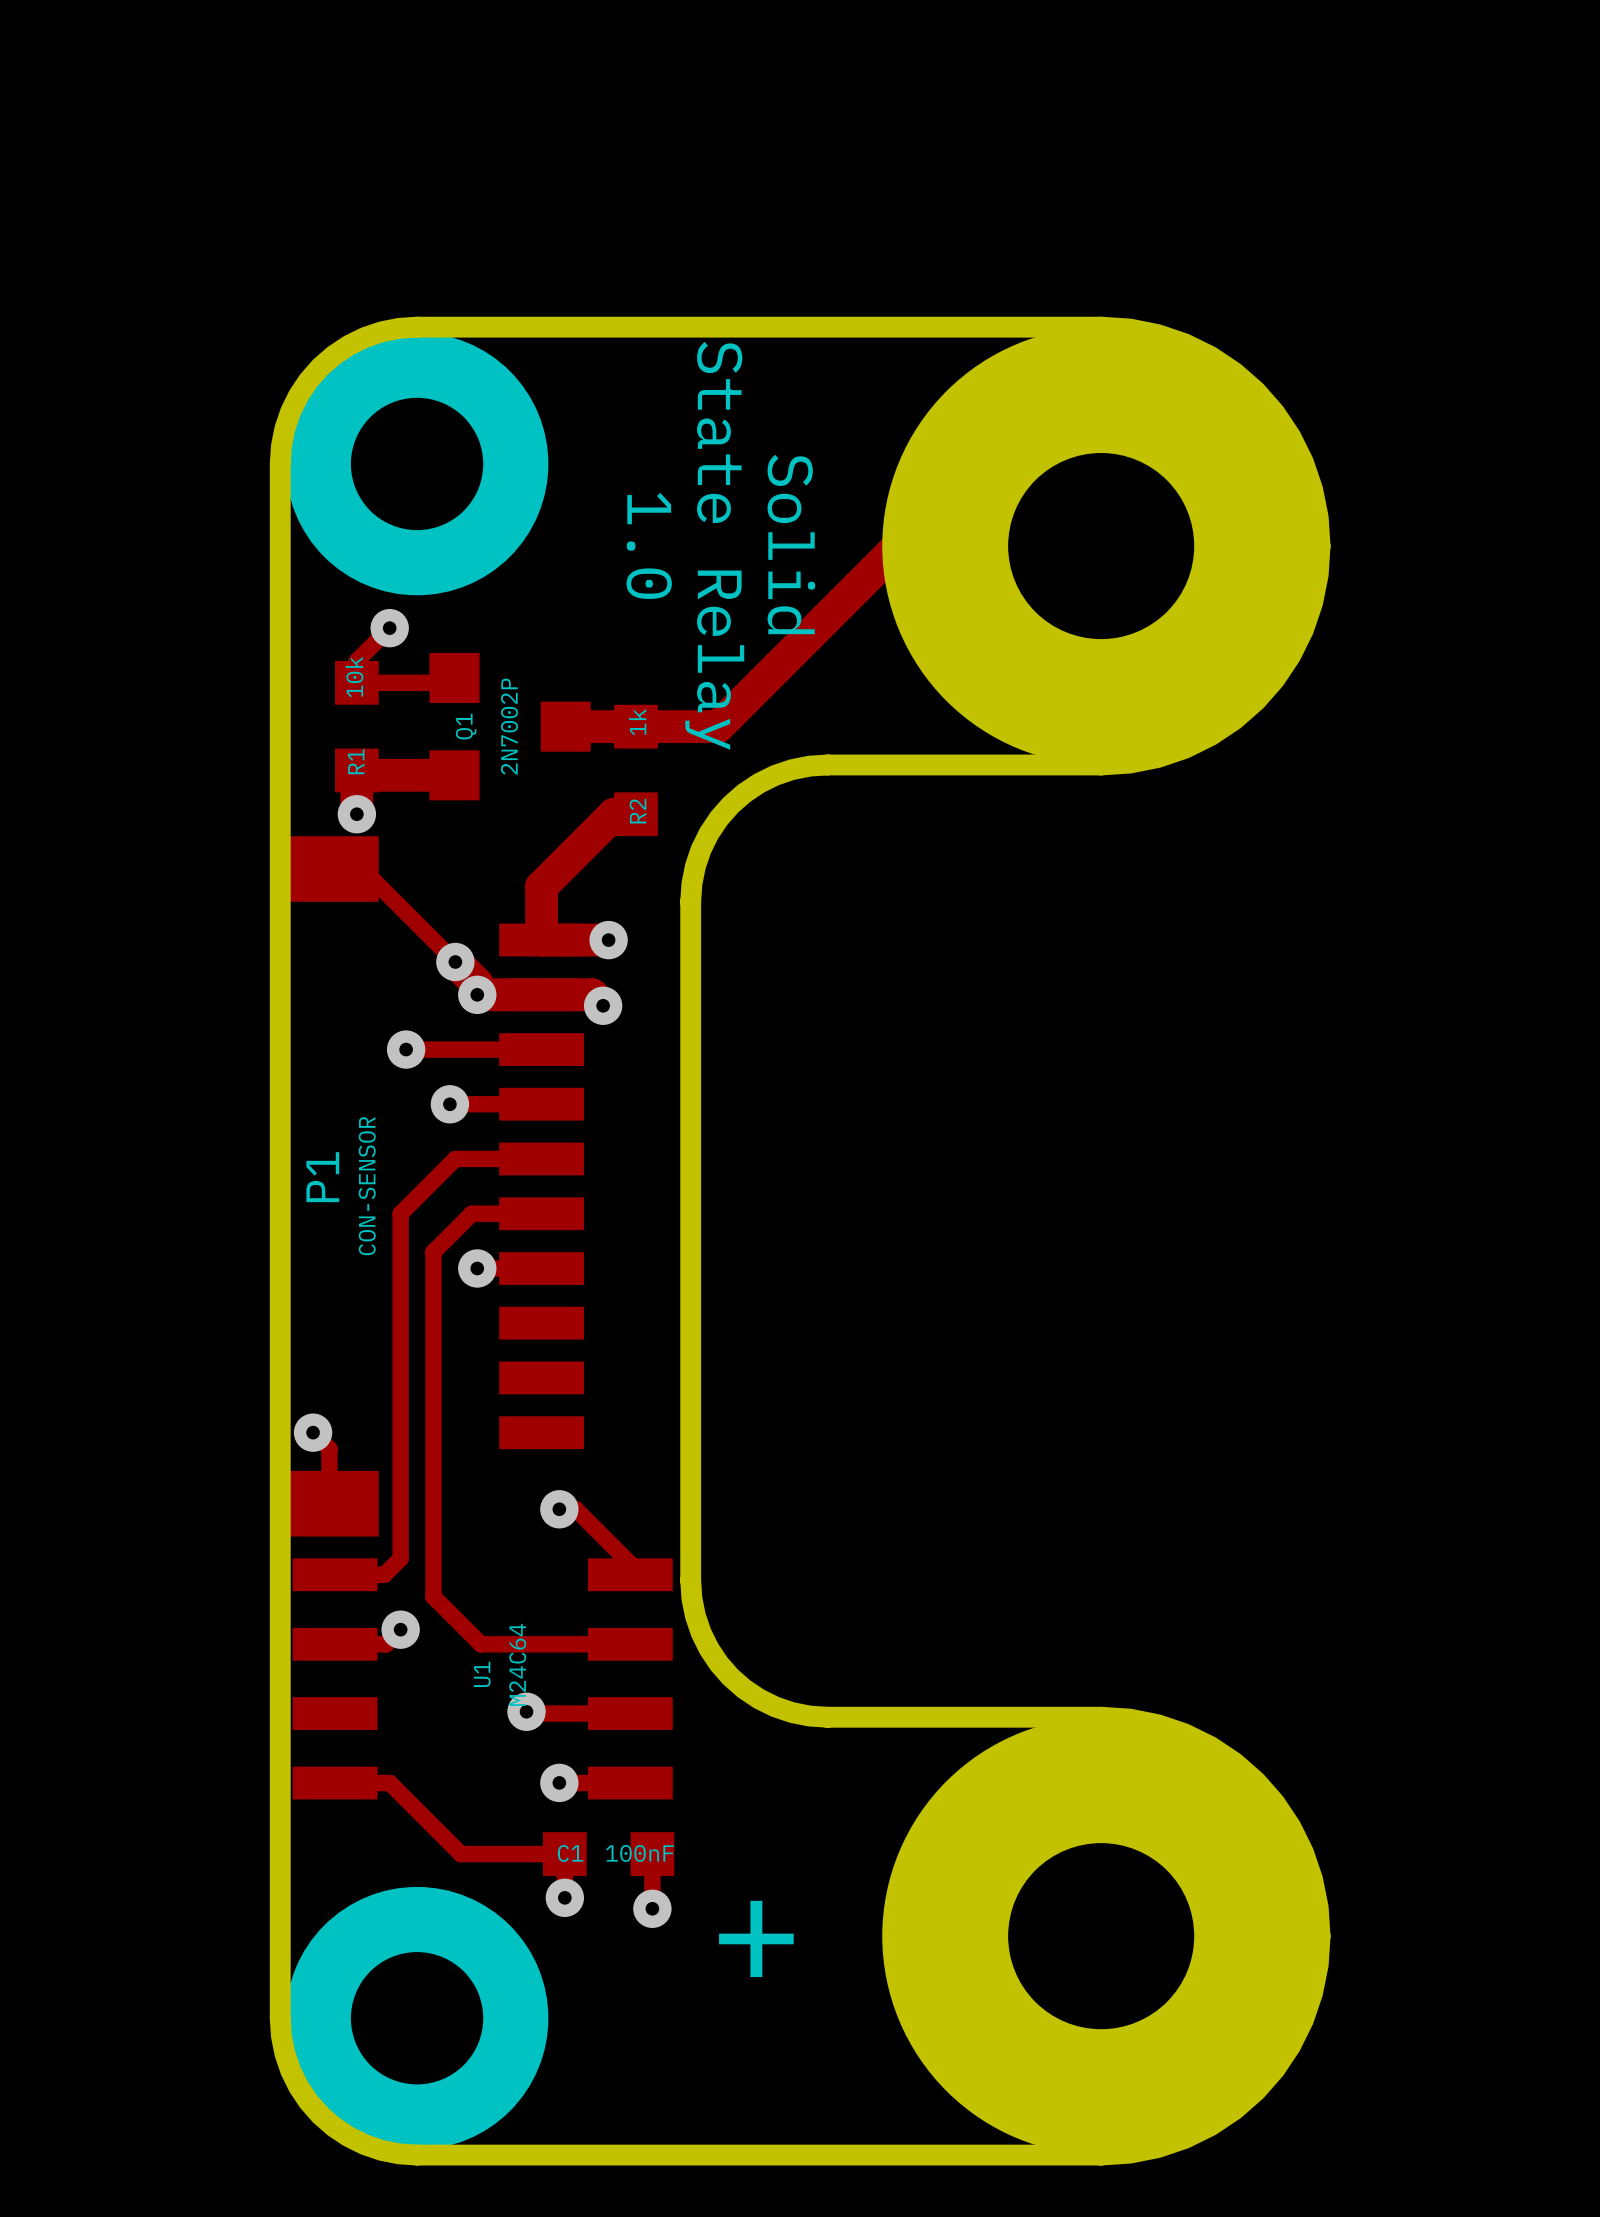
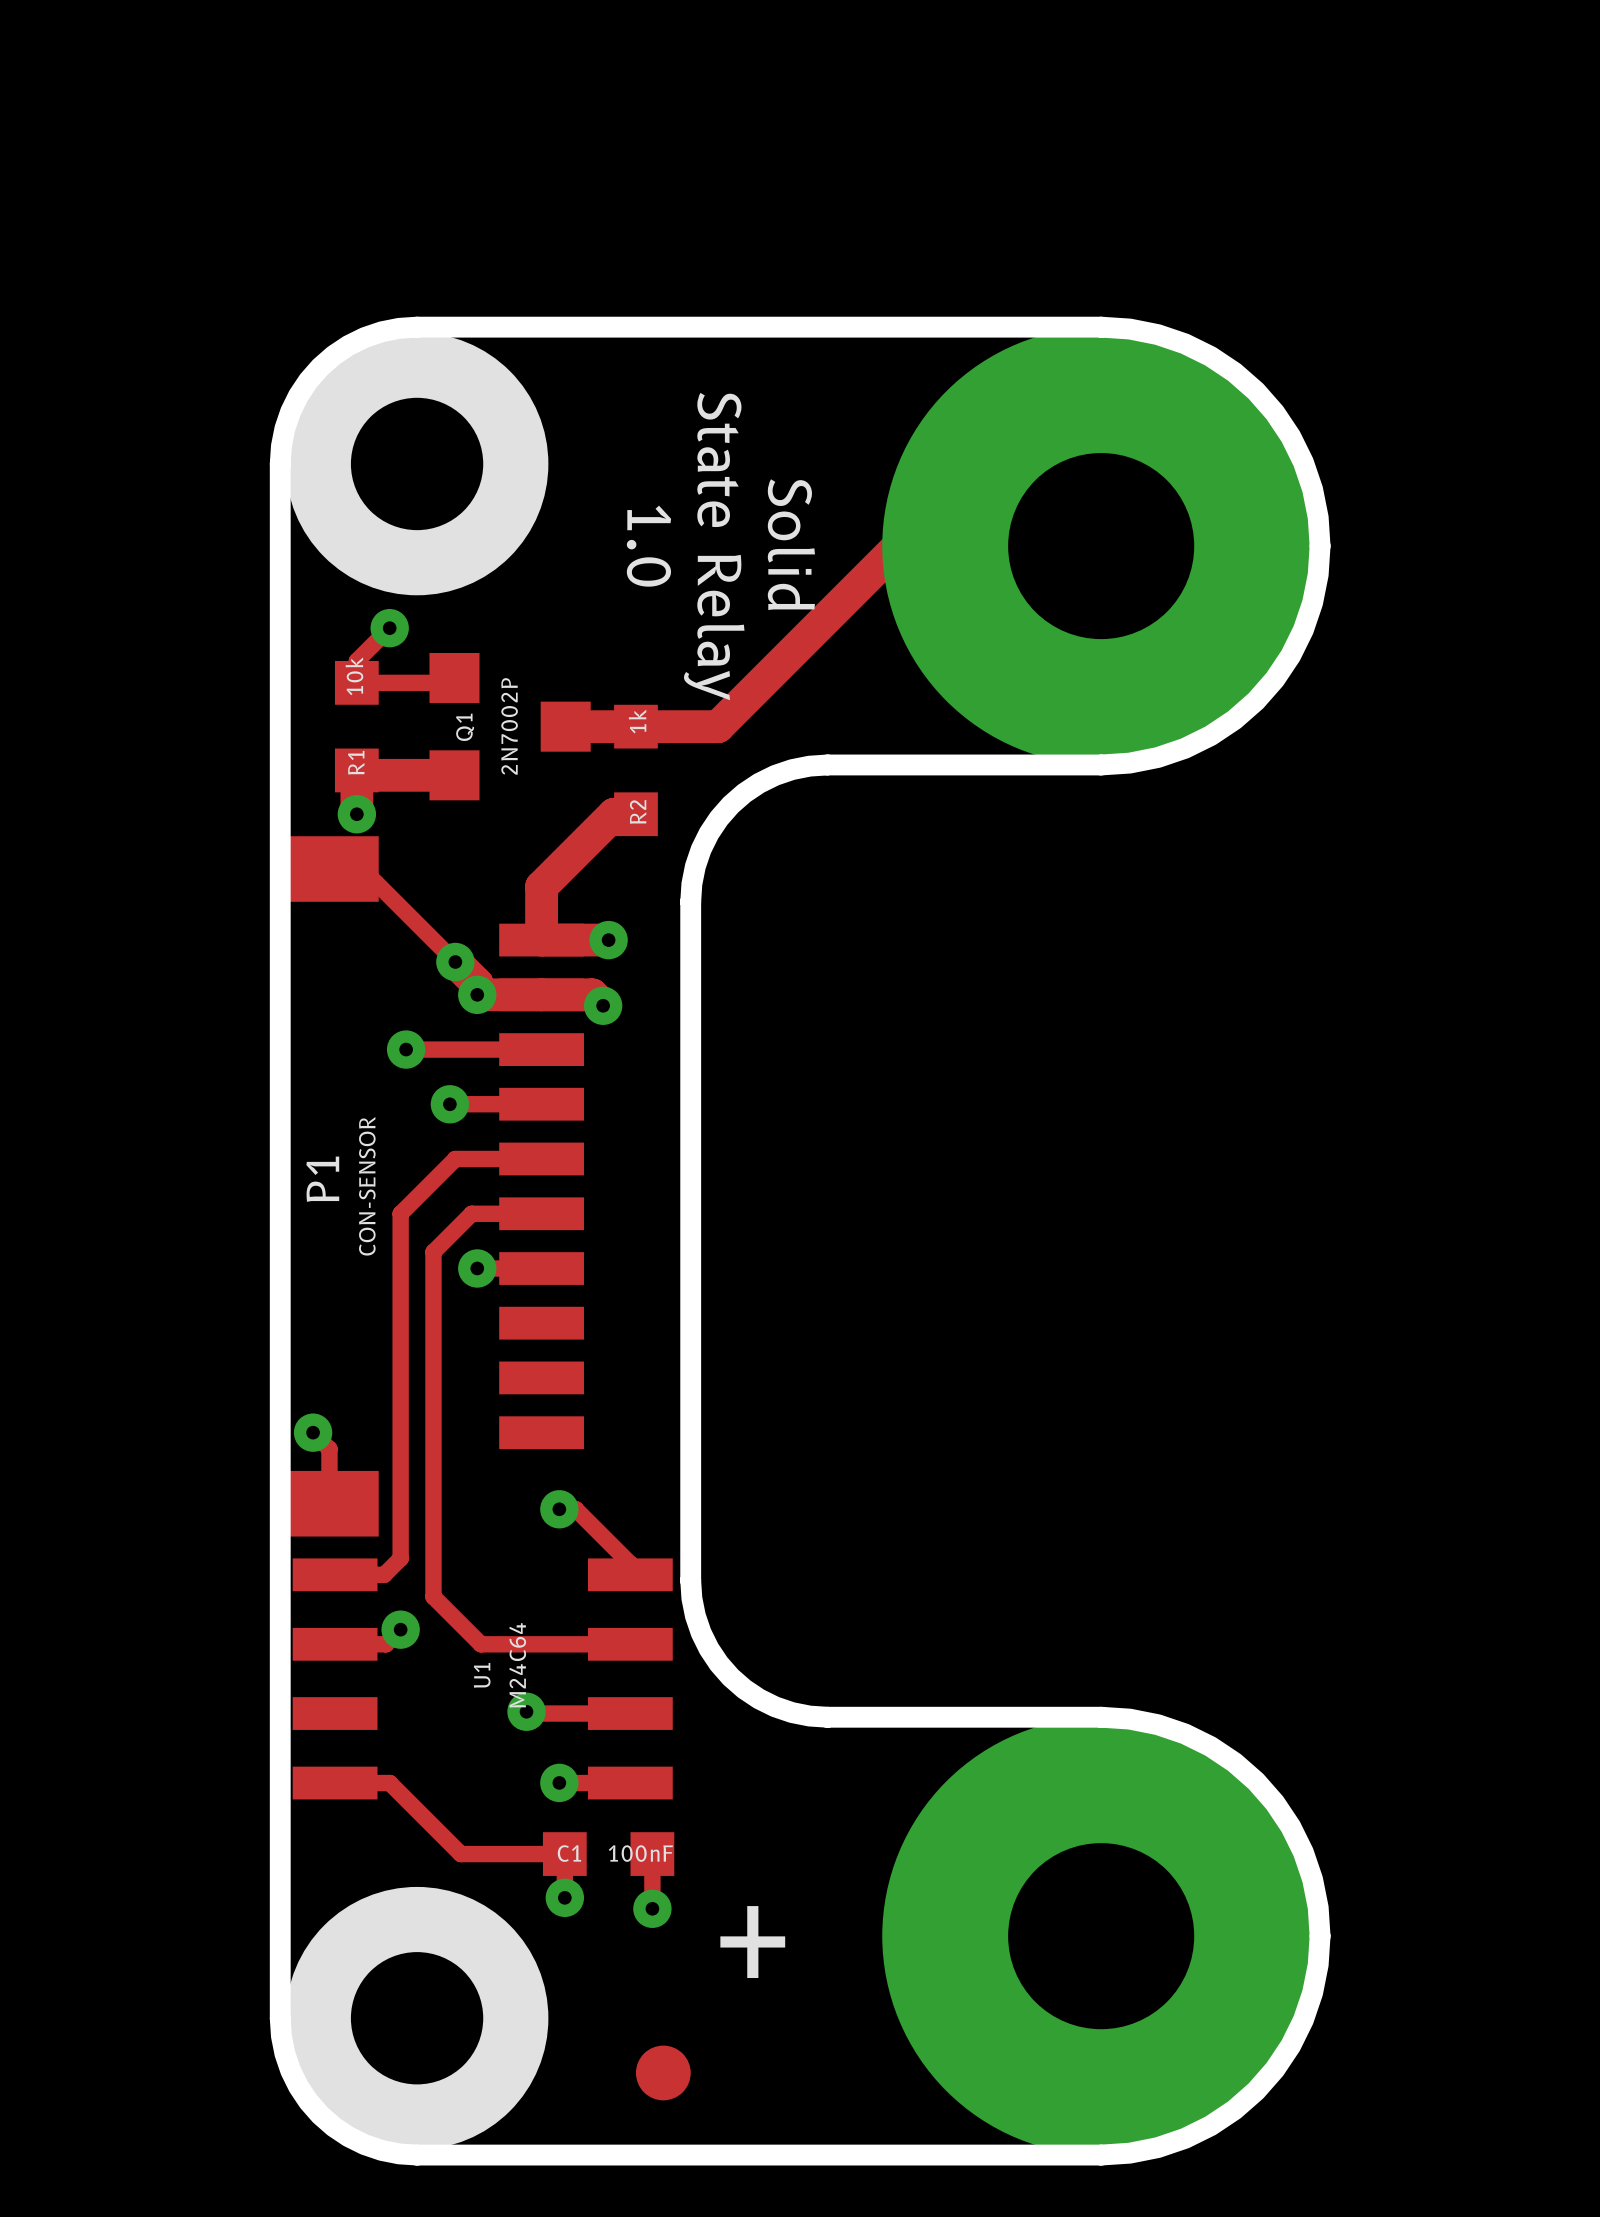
part: none -> (663, 2072)

